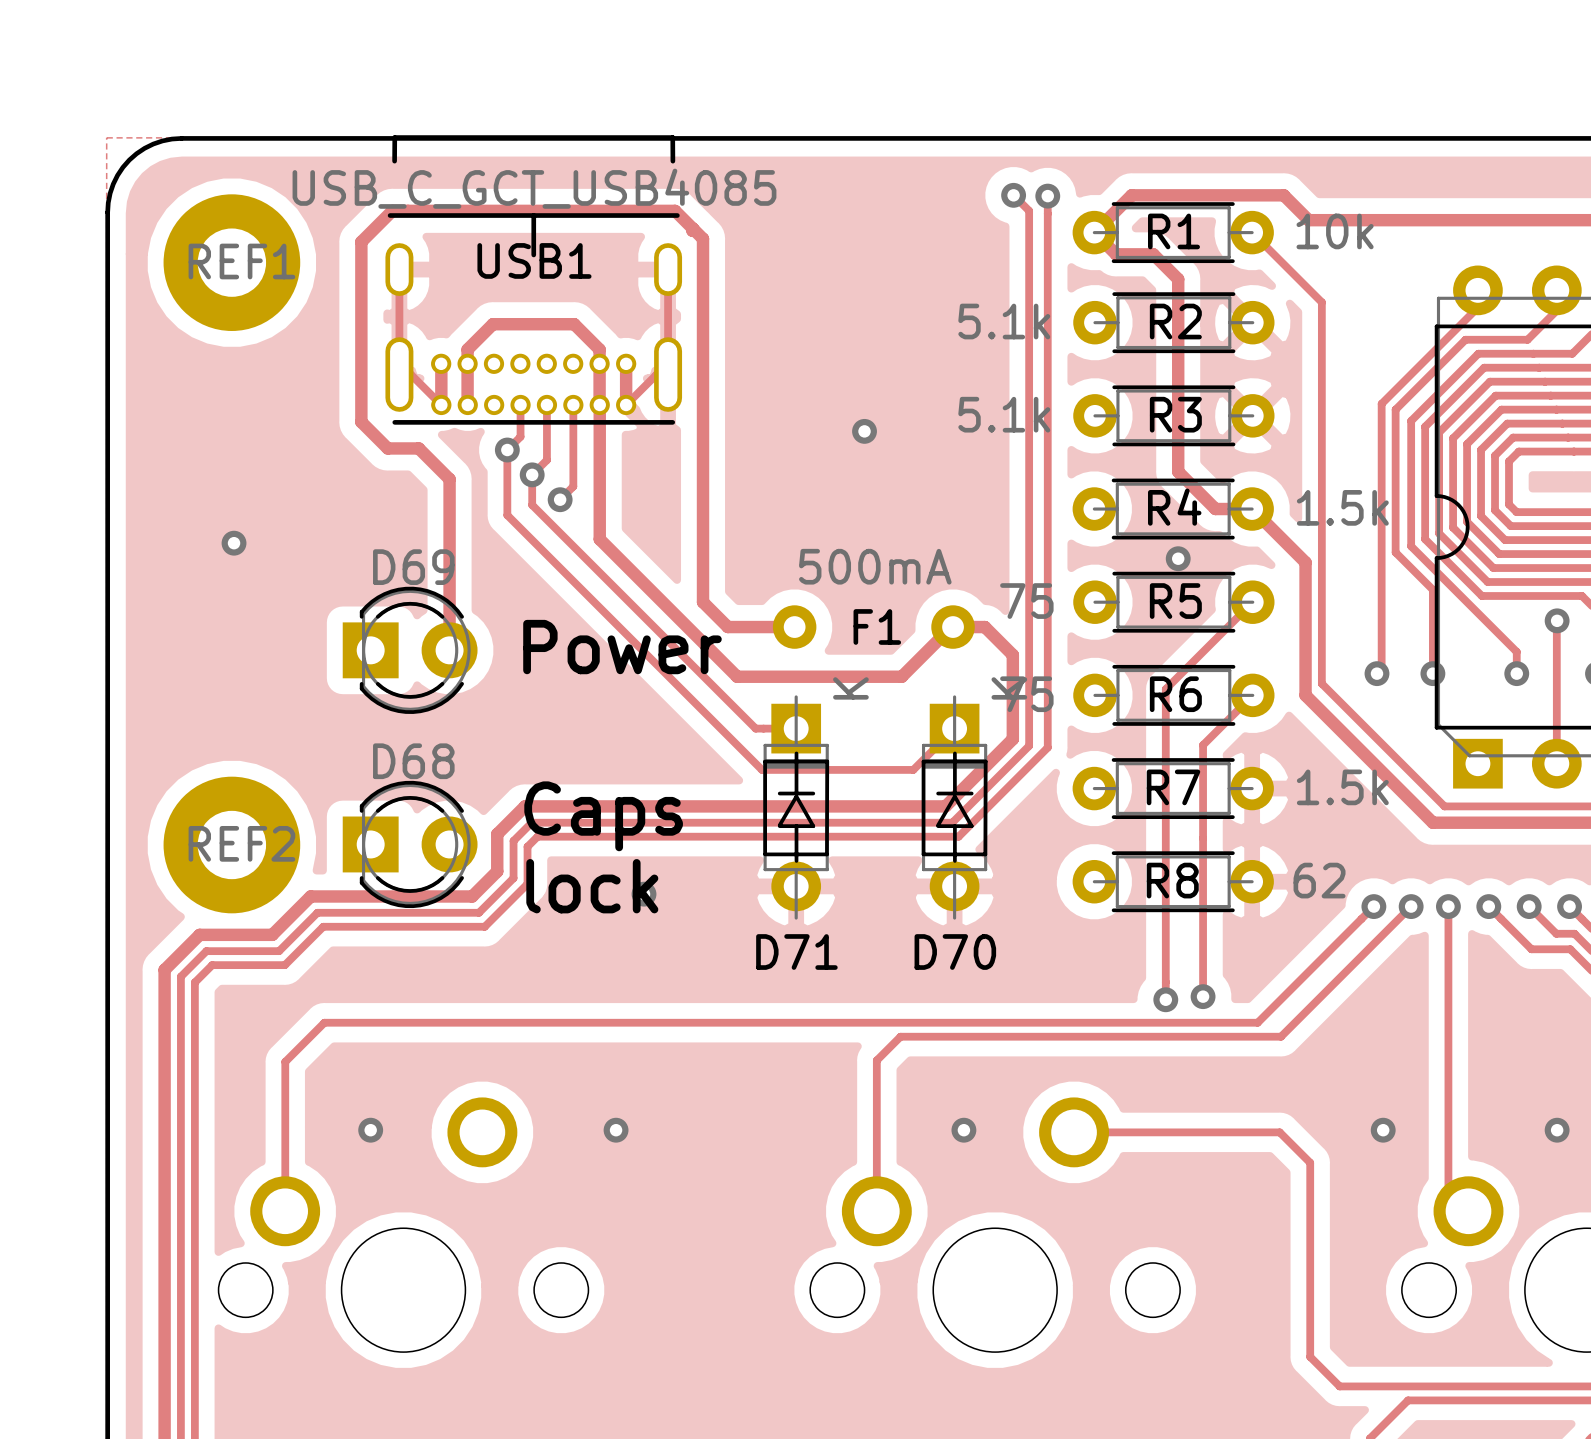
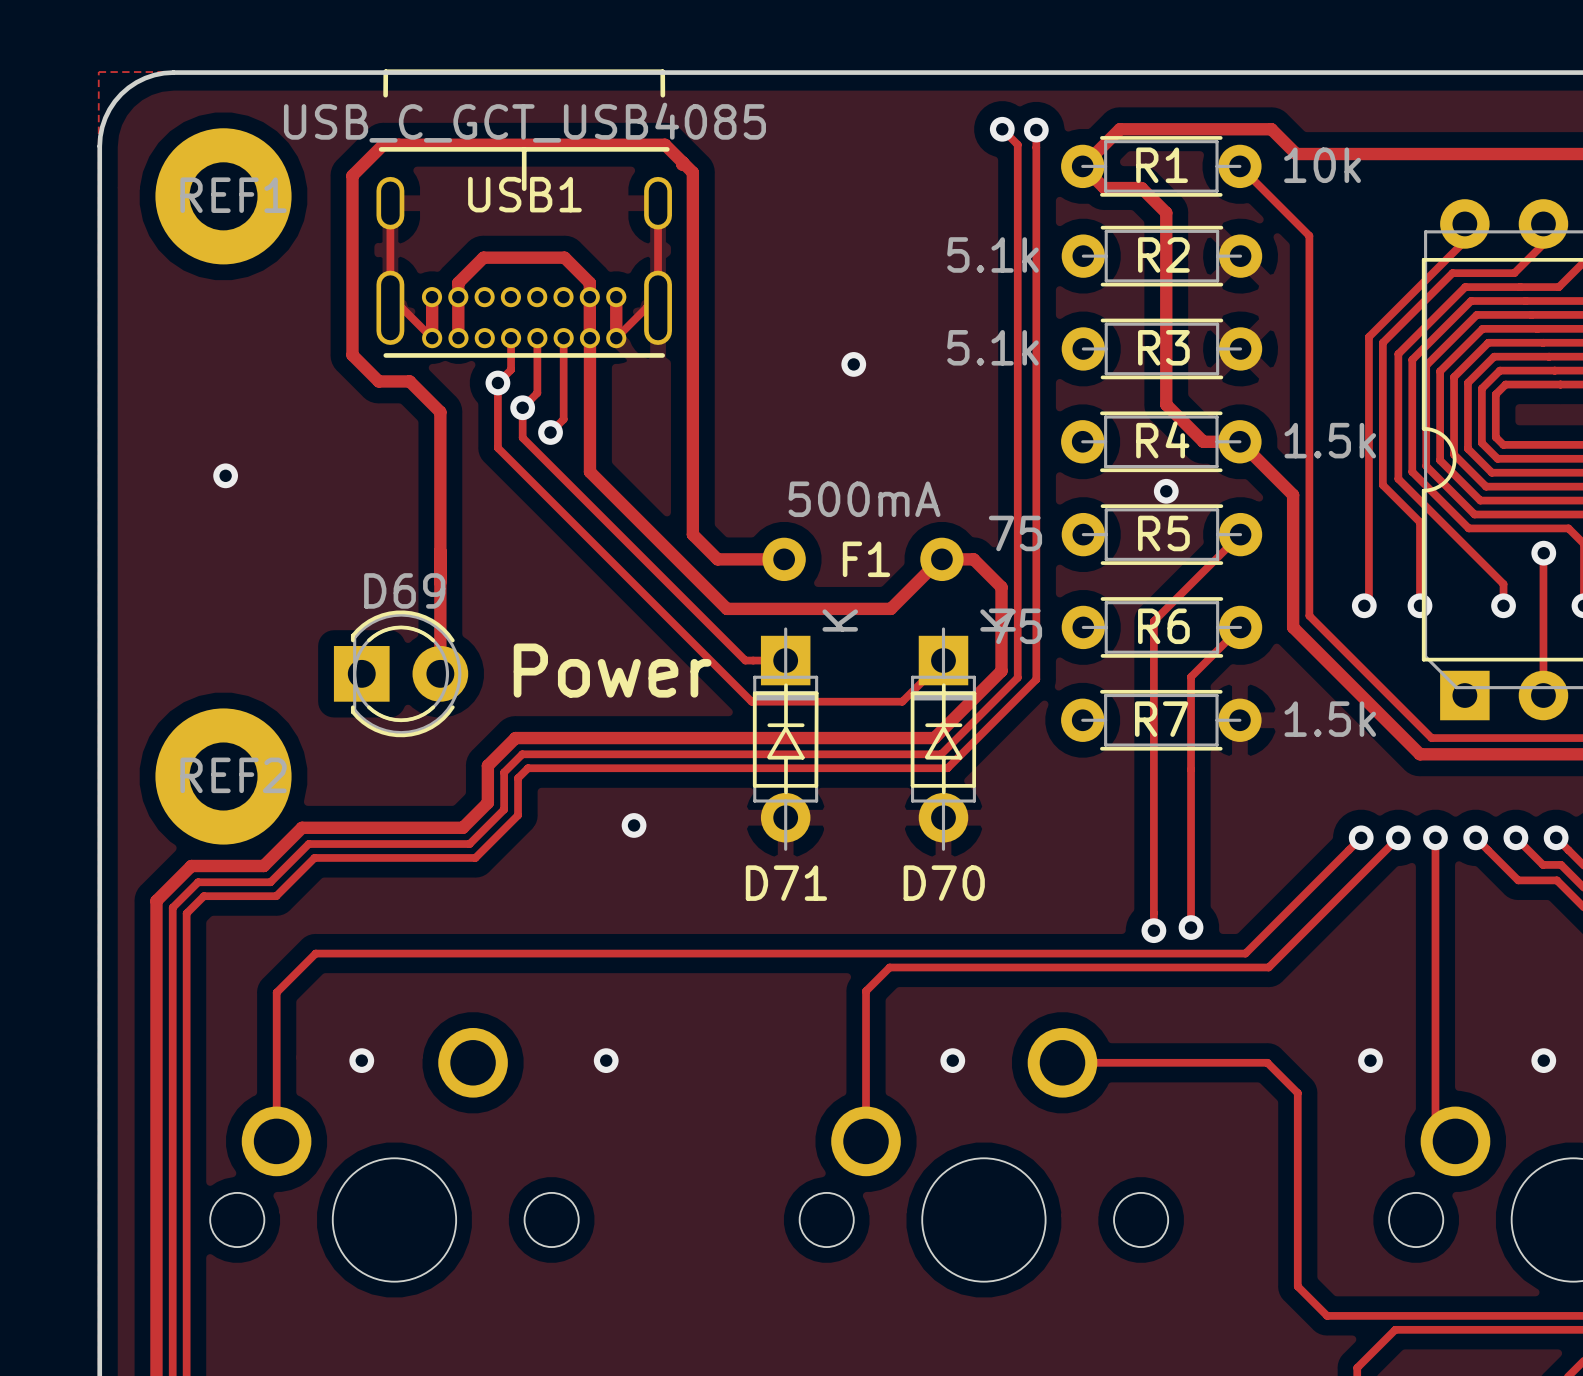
D69 position: (410, 650) -> (401, 673)
track: none -> (440, 582) (440, 673)
D68: Caps (410, 844) -> none
R8: 62 (1173, 881) -> none

